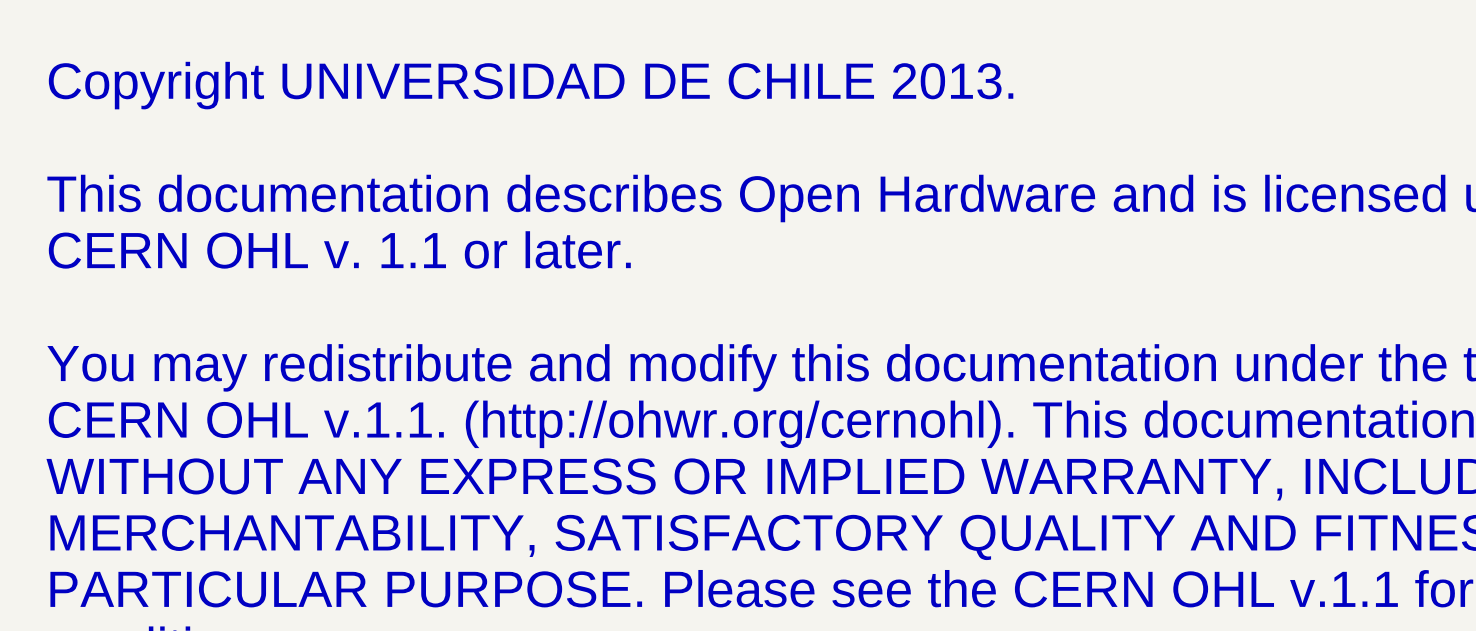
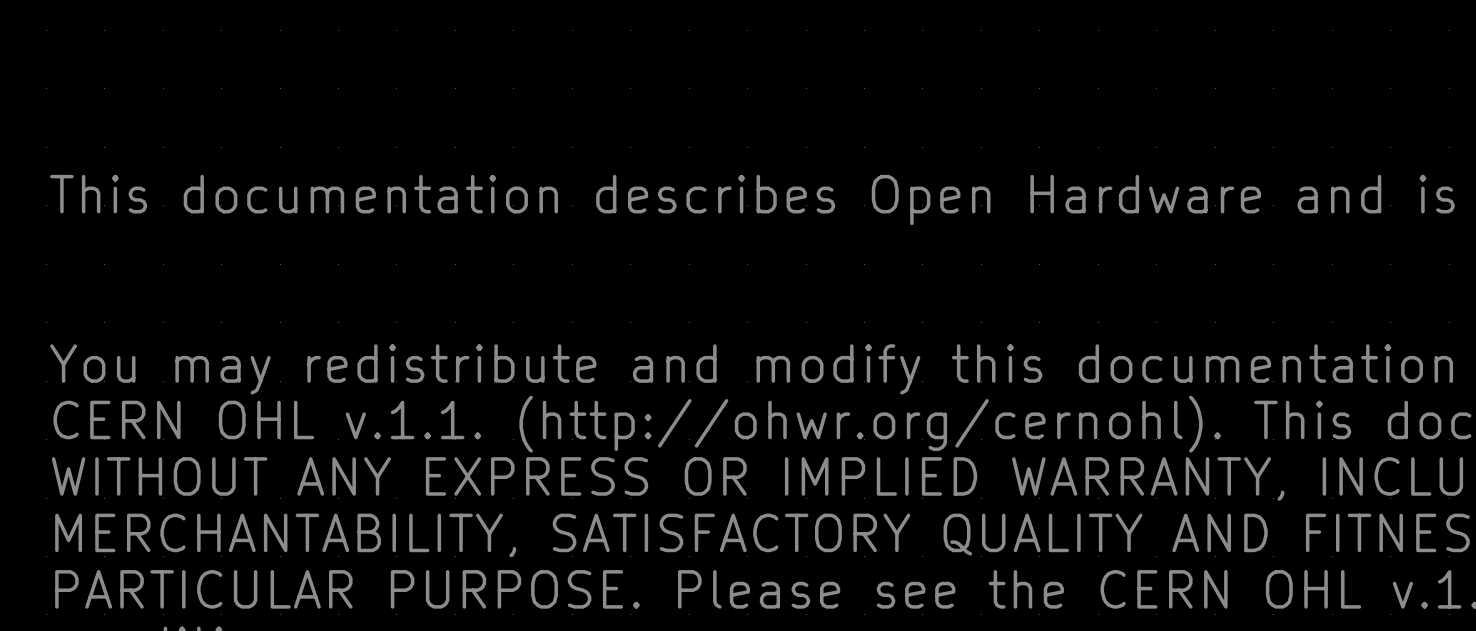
text: Copyright UNIVERSIDAD DE CHILE 2013. (531, 85) -> none
text: CERN OHL v. 1.1 or later. (339, 249) -> none

